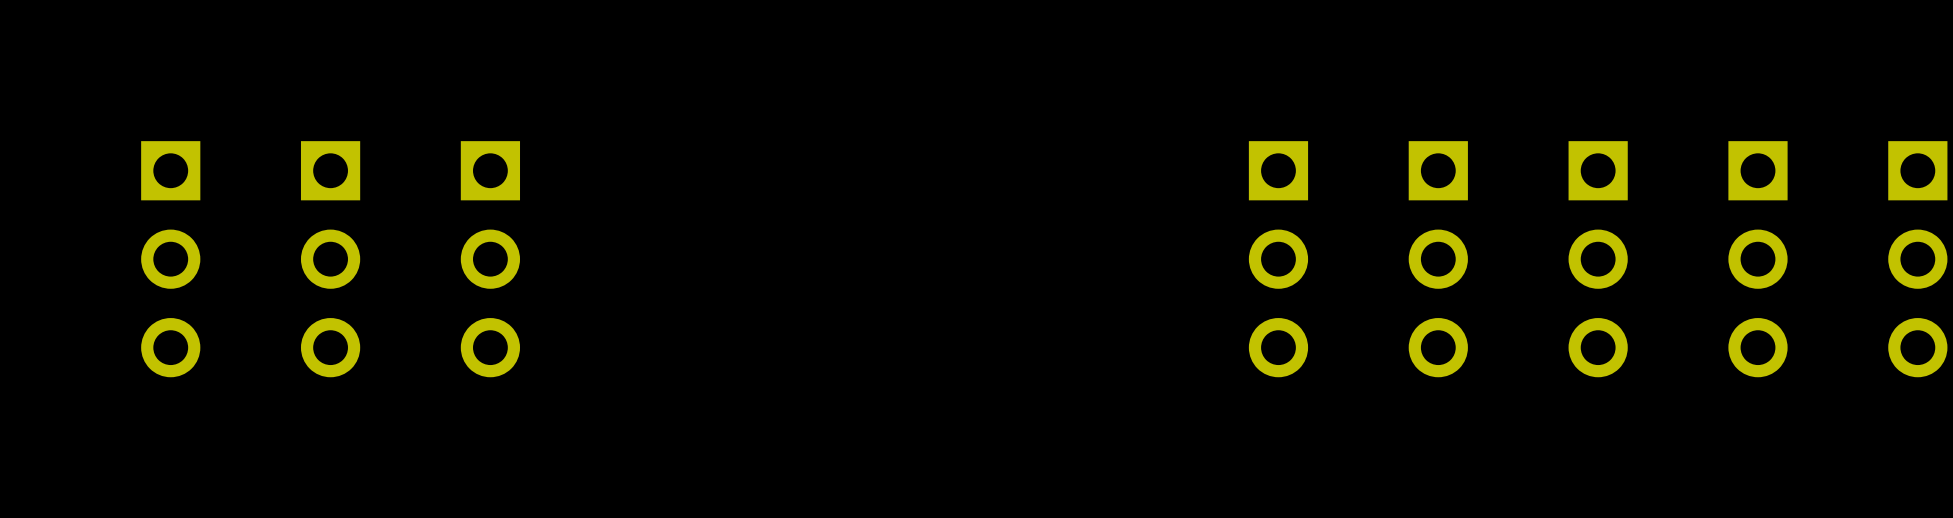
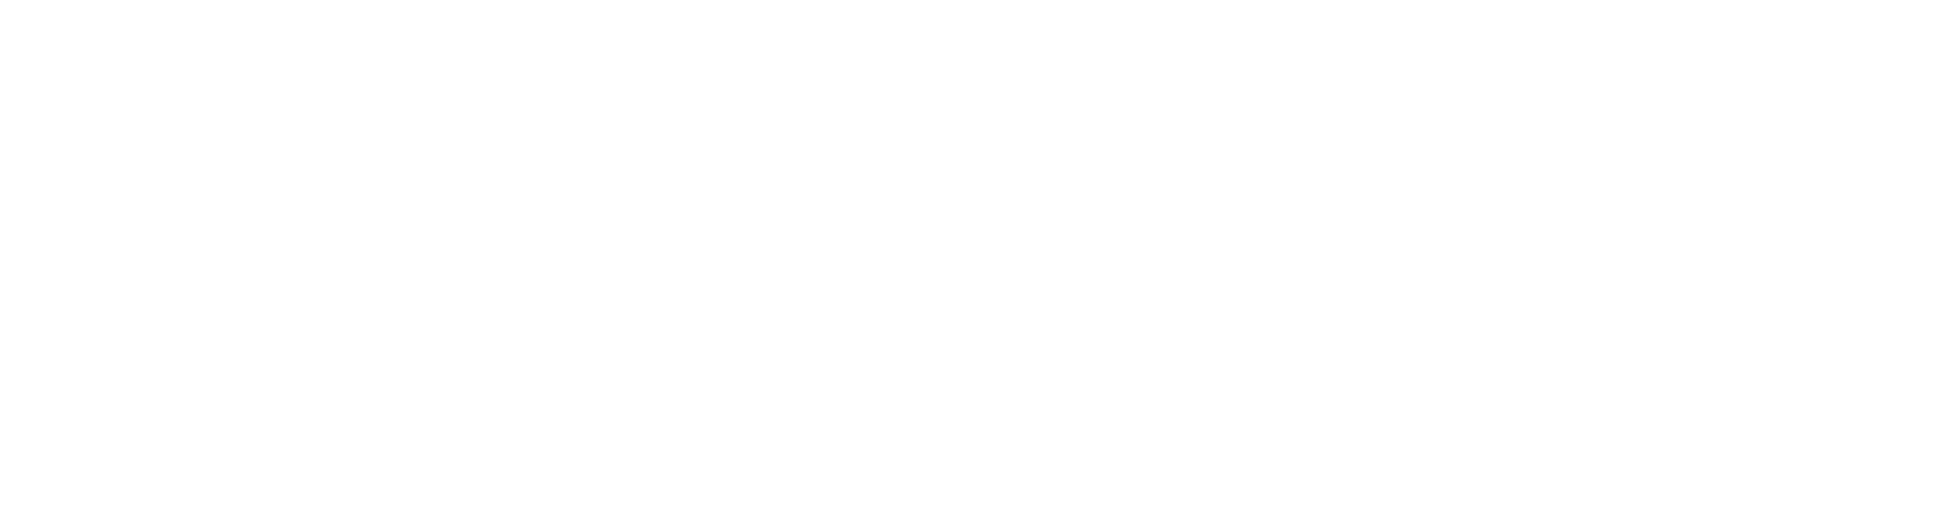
part: (170, 259) -> none
part: (330, 259) -> none
part: (490, 259) -> none
part: (1278, 259) -> none
part: (1438, 259) -> none
part: (1598, 259) -> none
part: (1757, 259) -> none
part: (1917, 259) -> none

